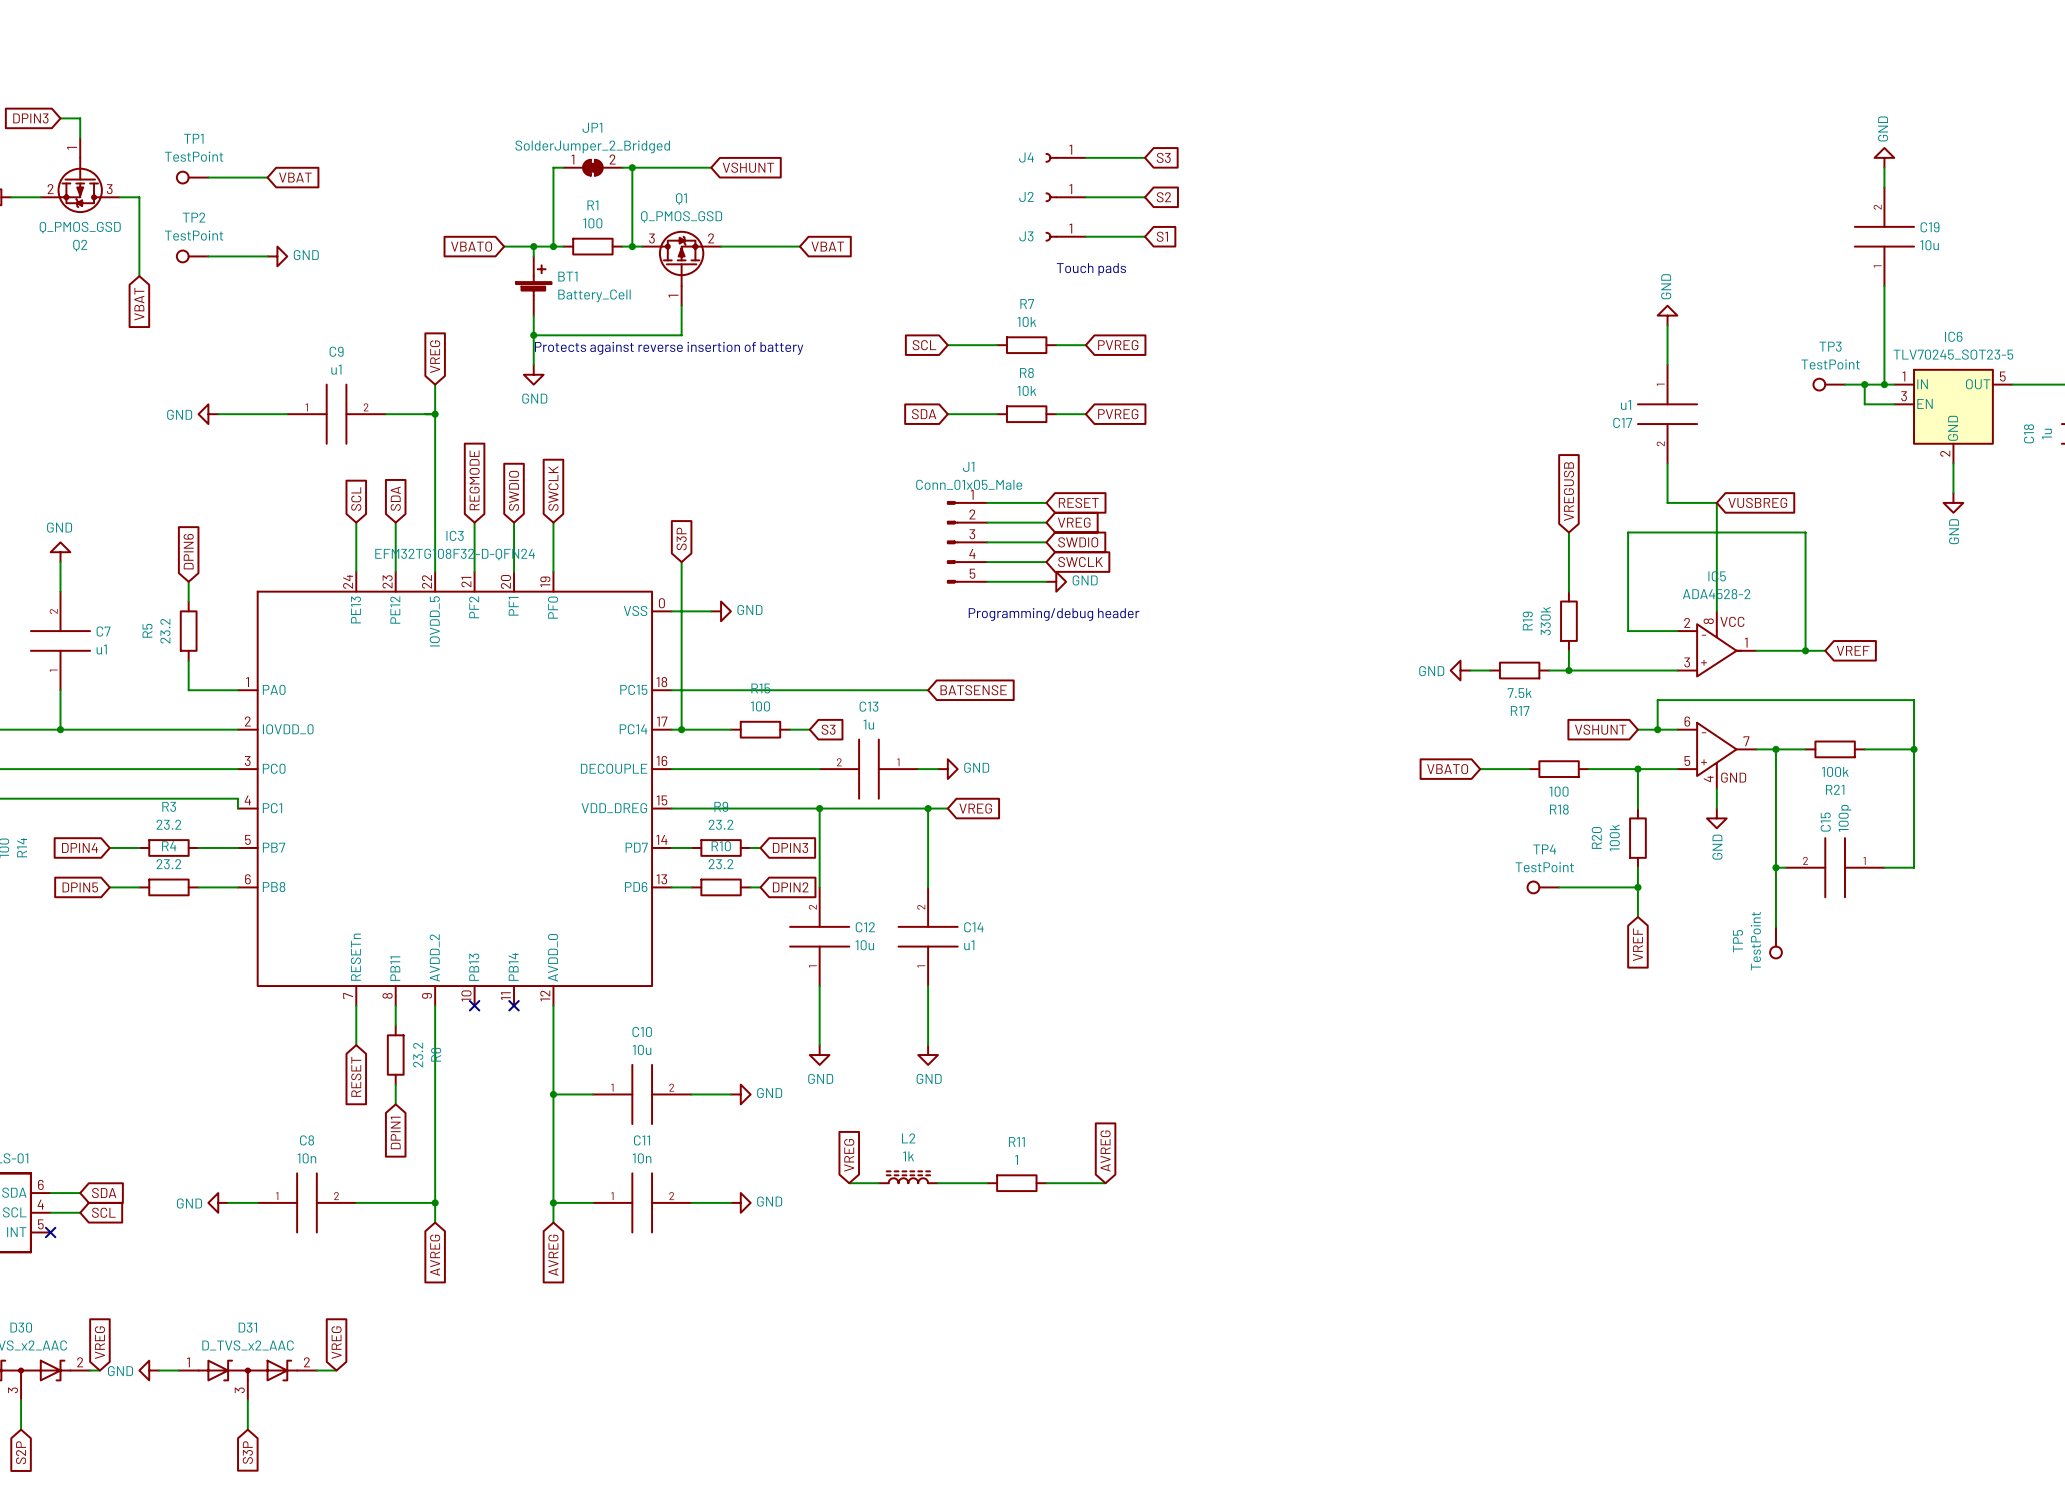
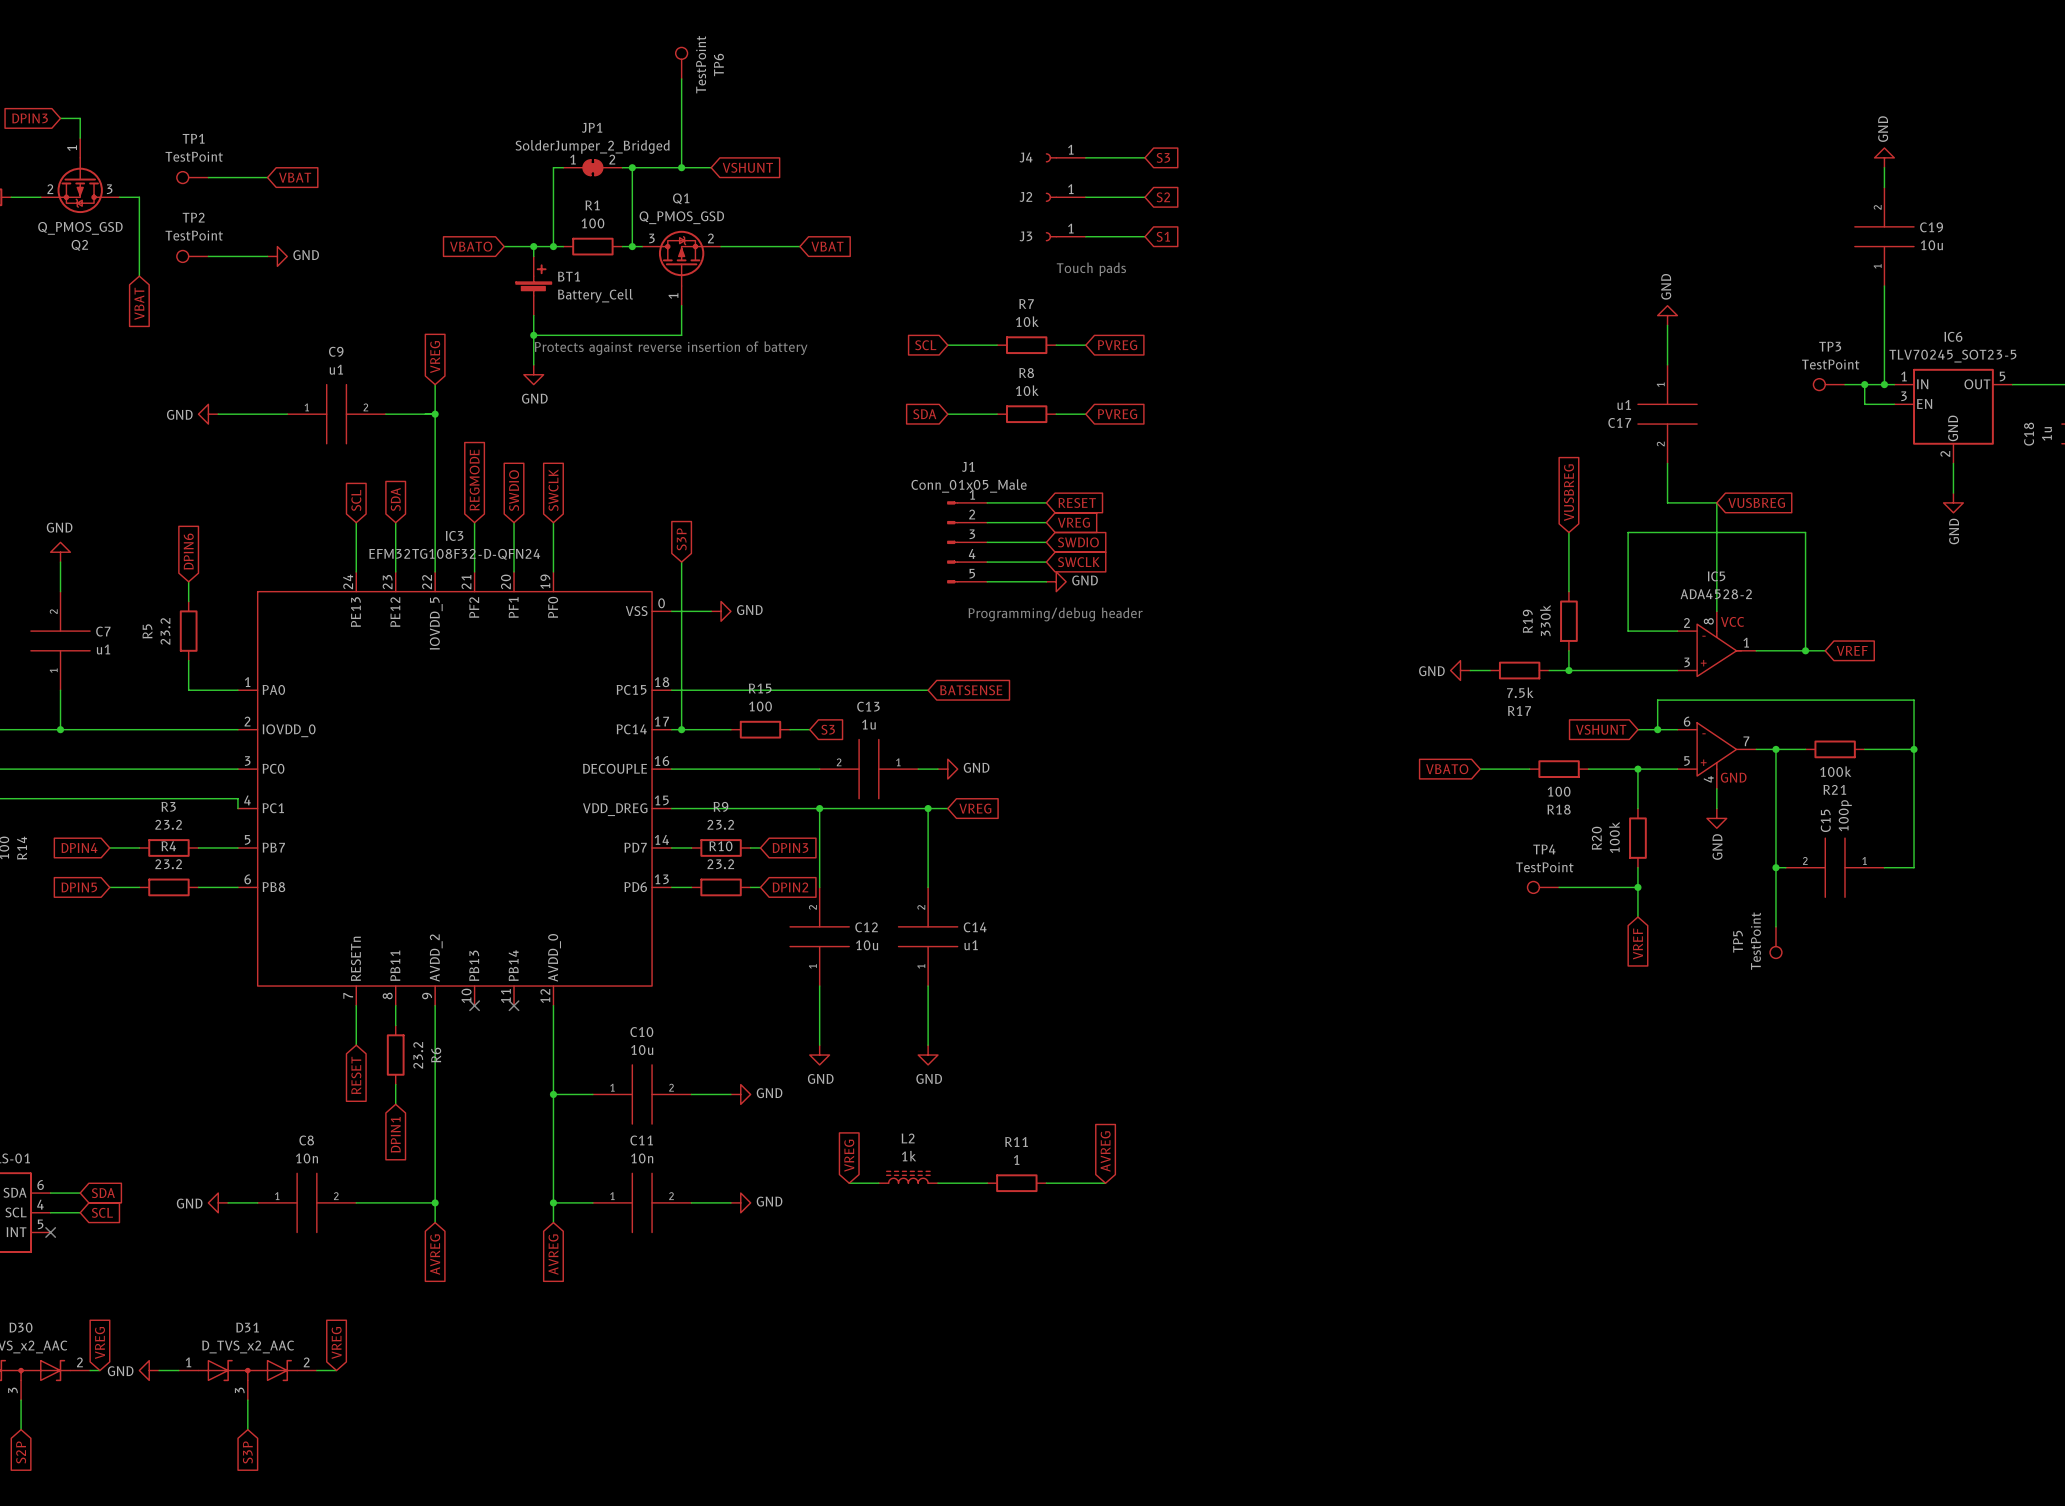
TP6: none -> TestPoint (681, 63)
wire: none -> (681, 78) (681, 167)
junction: none -> (681, 167)
global label: VREGUSB (1568, 491) -> VUSBREG (1569, 492)

